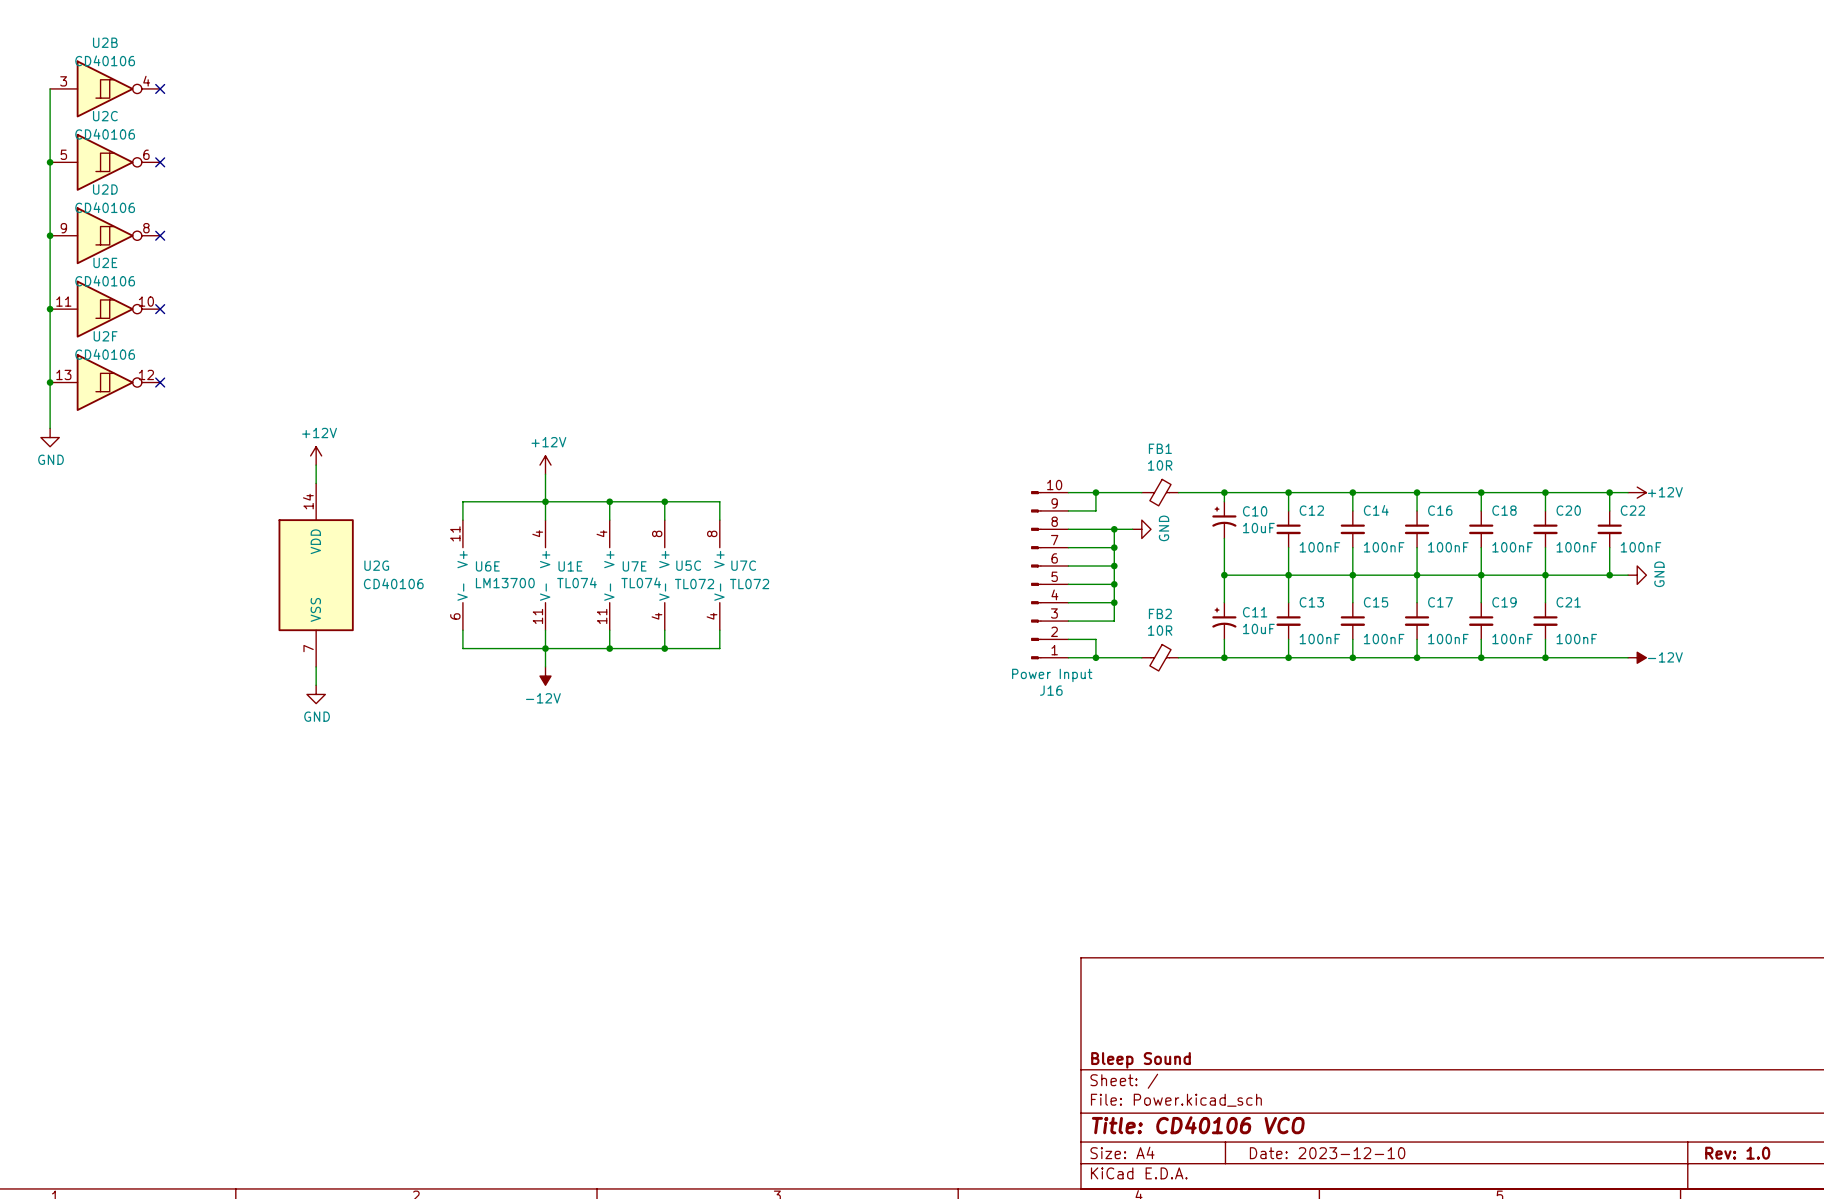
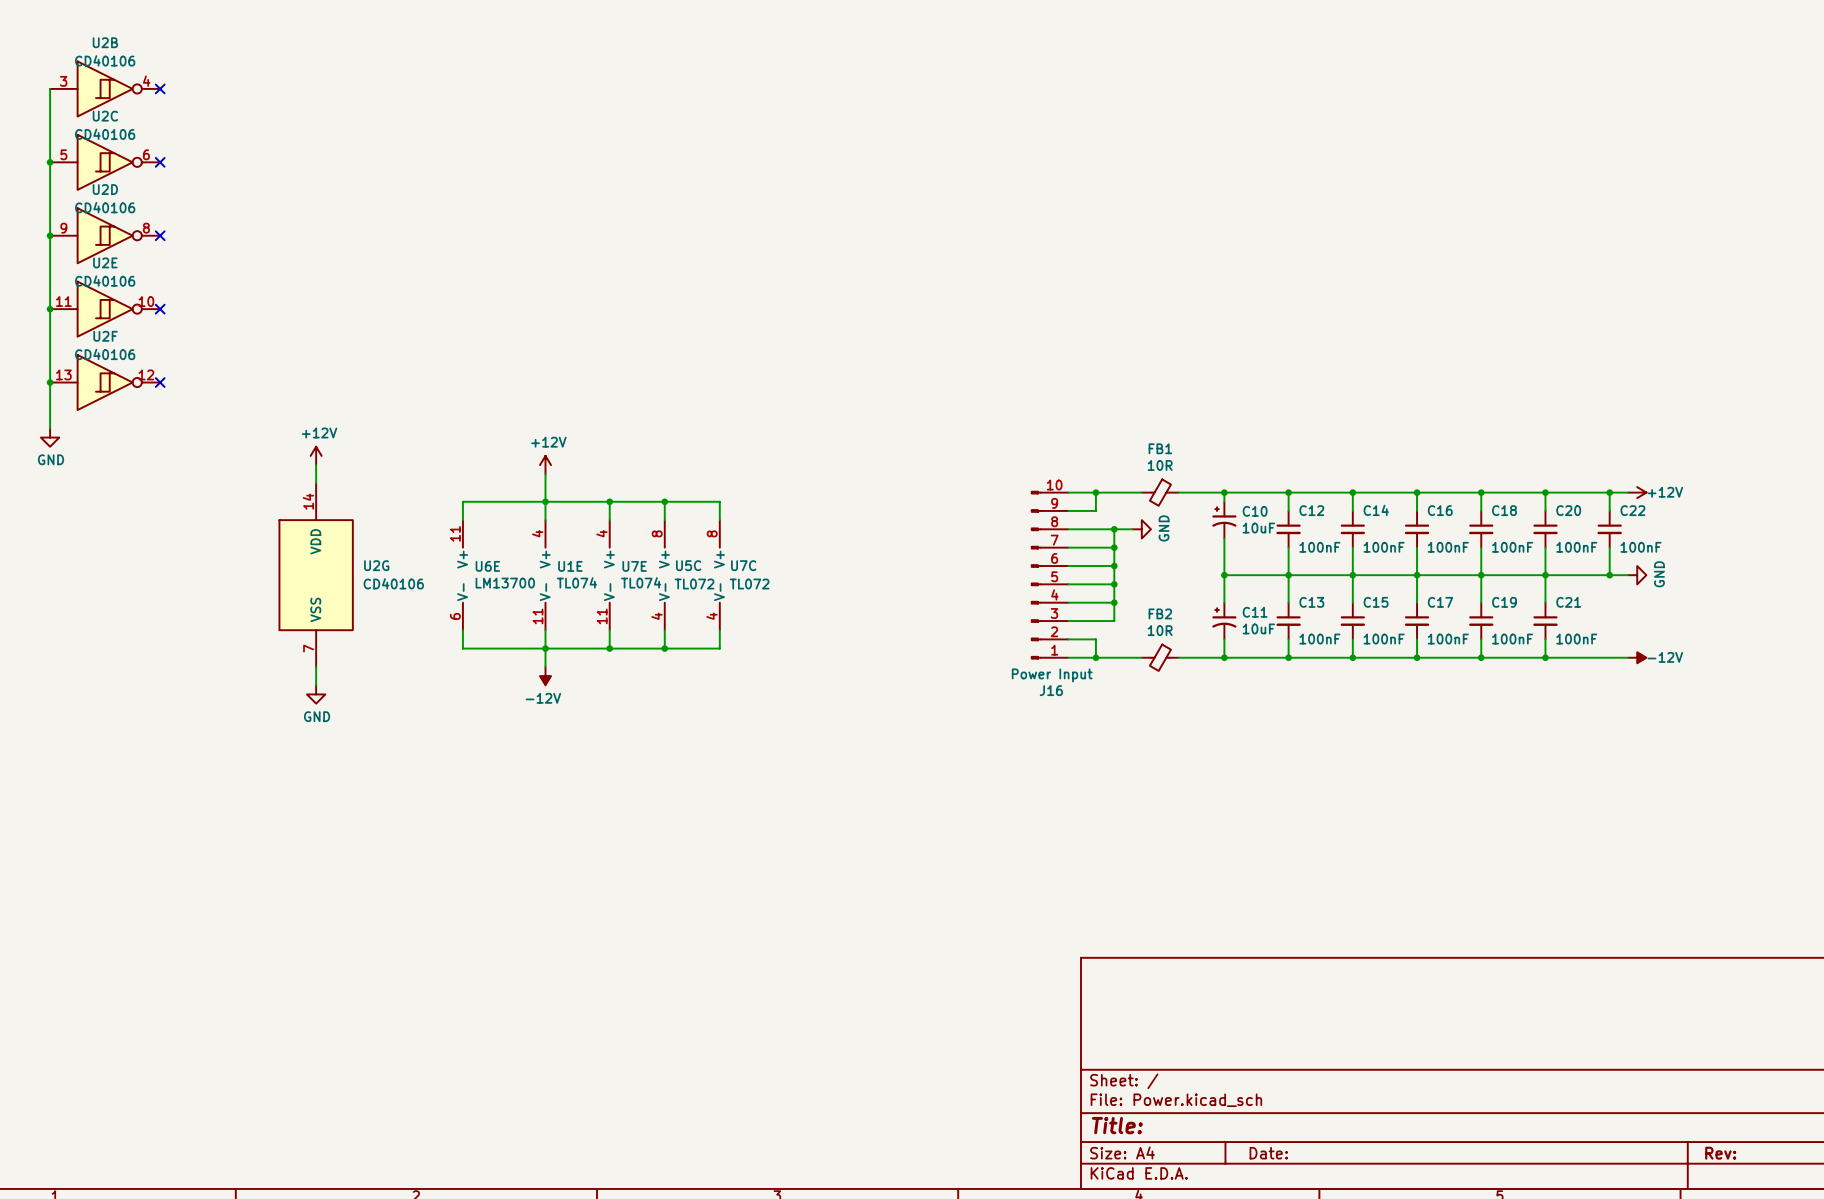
title block: Bleep Sound (1140, 1060) -> none
title block: Title: CD40106 VCO (1198, 1125) -> Title: (1117, 1125)
title block: Date: 2023-12-10 (1327, 1153) -> Date: (1268, 1153)
title block: Rev: 1.0 (1737, 1153) -> Rev: (1720, 1153)

